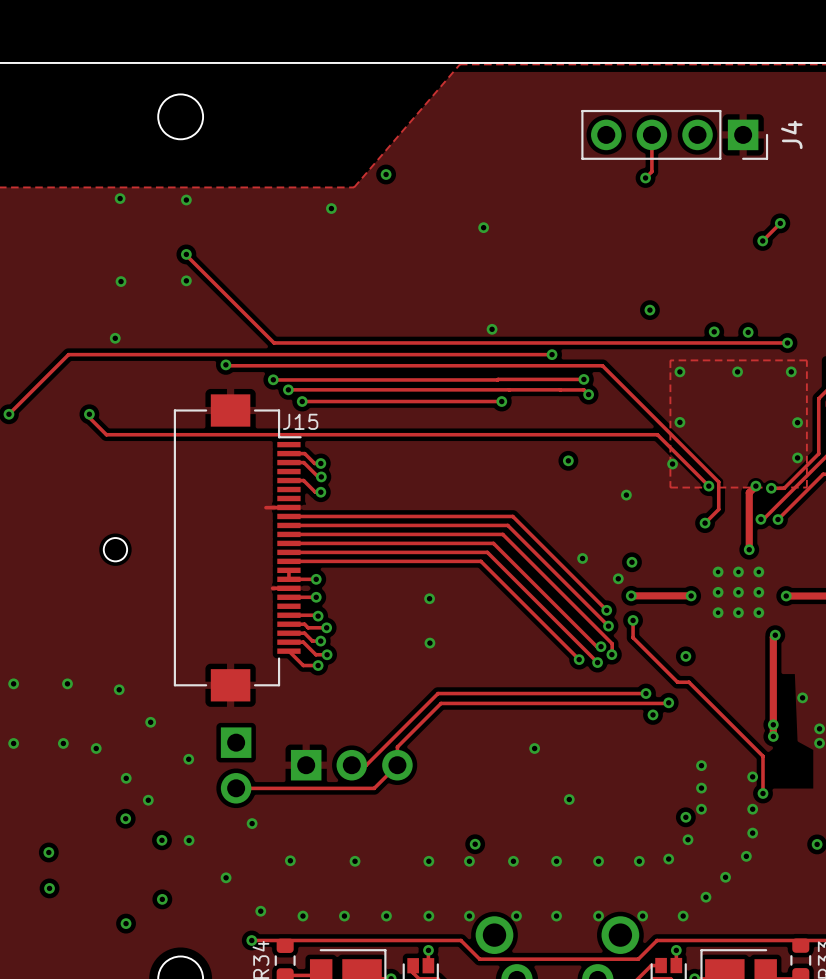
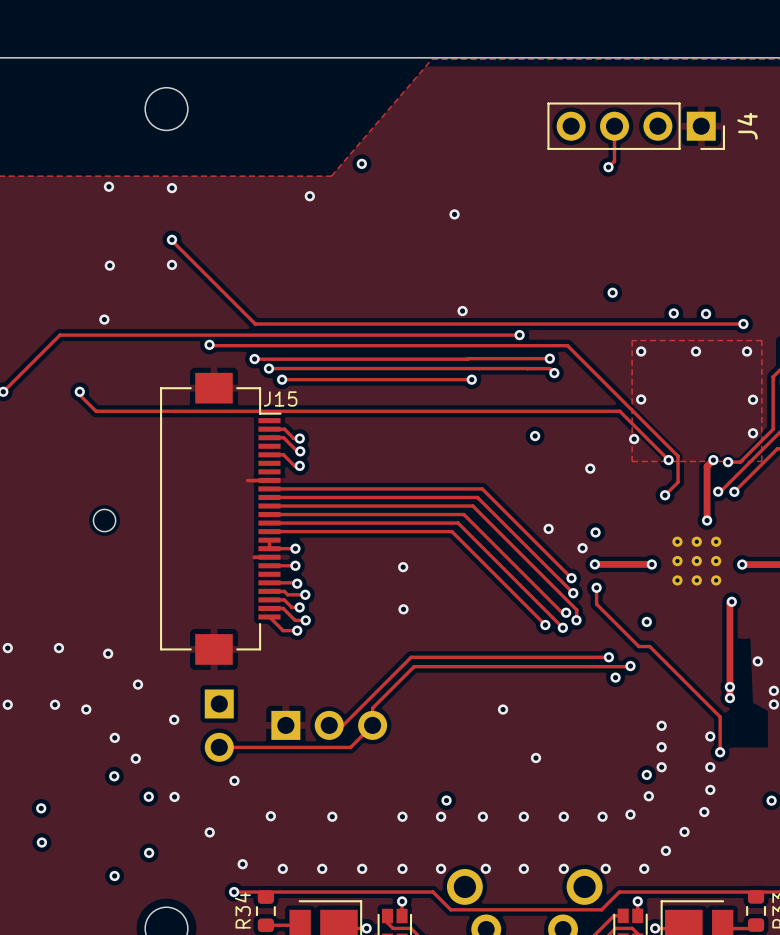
track: (780, 223) (762, 240) -> none
via: (780, 223) -> none
via: (762, 240) -> none

